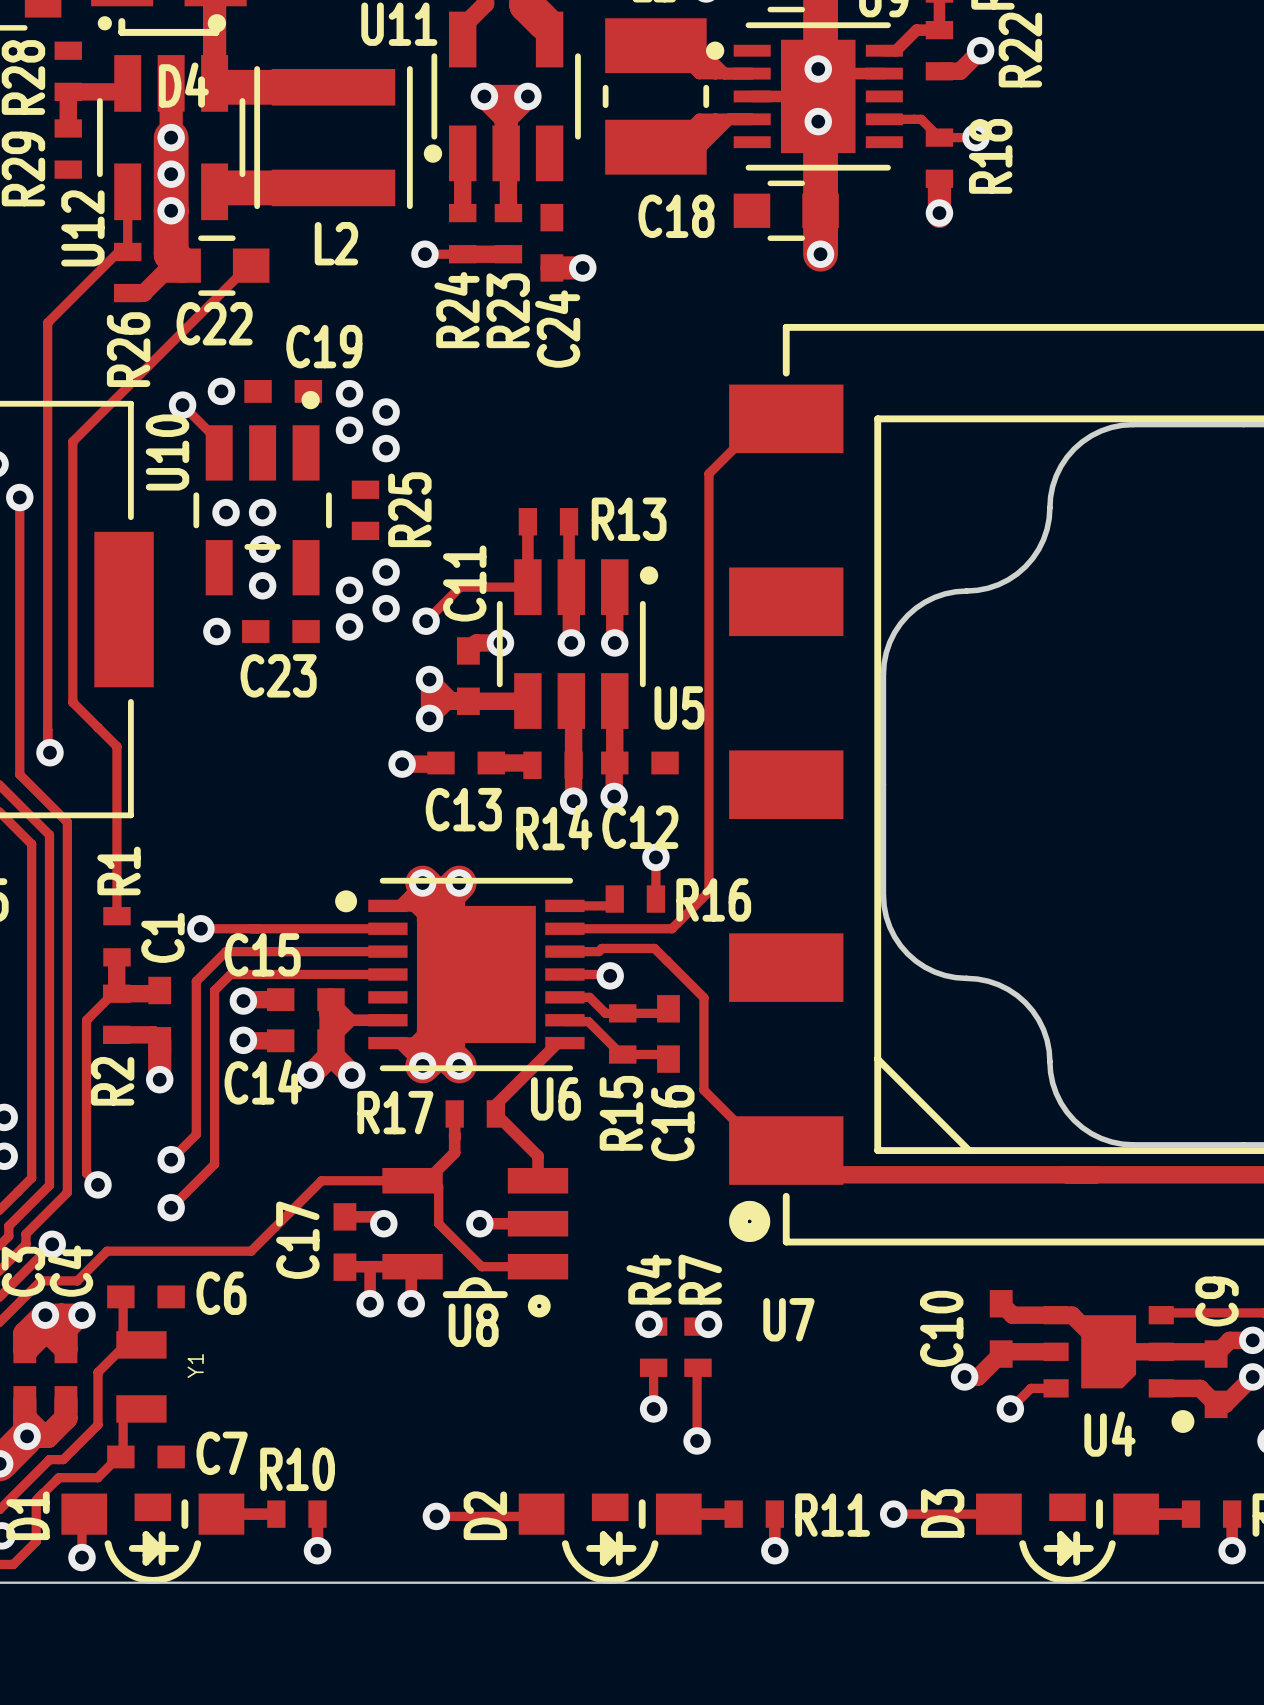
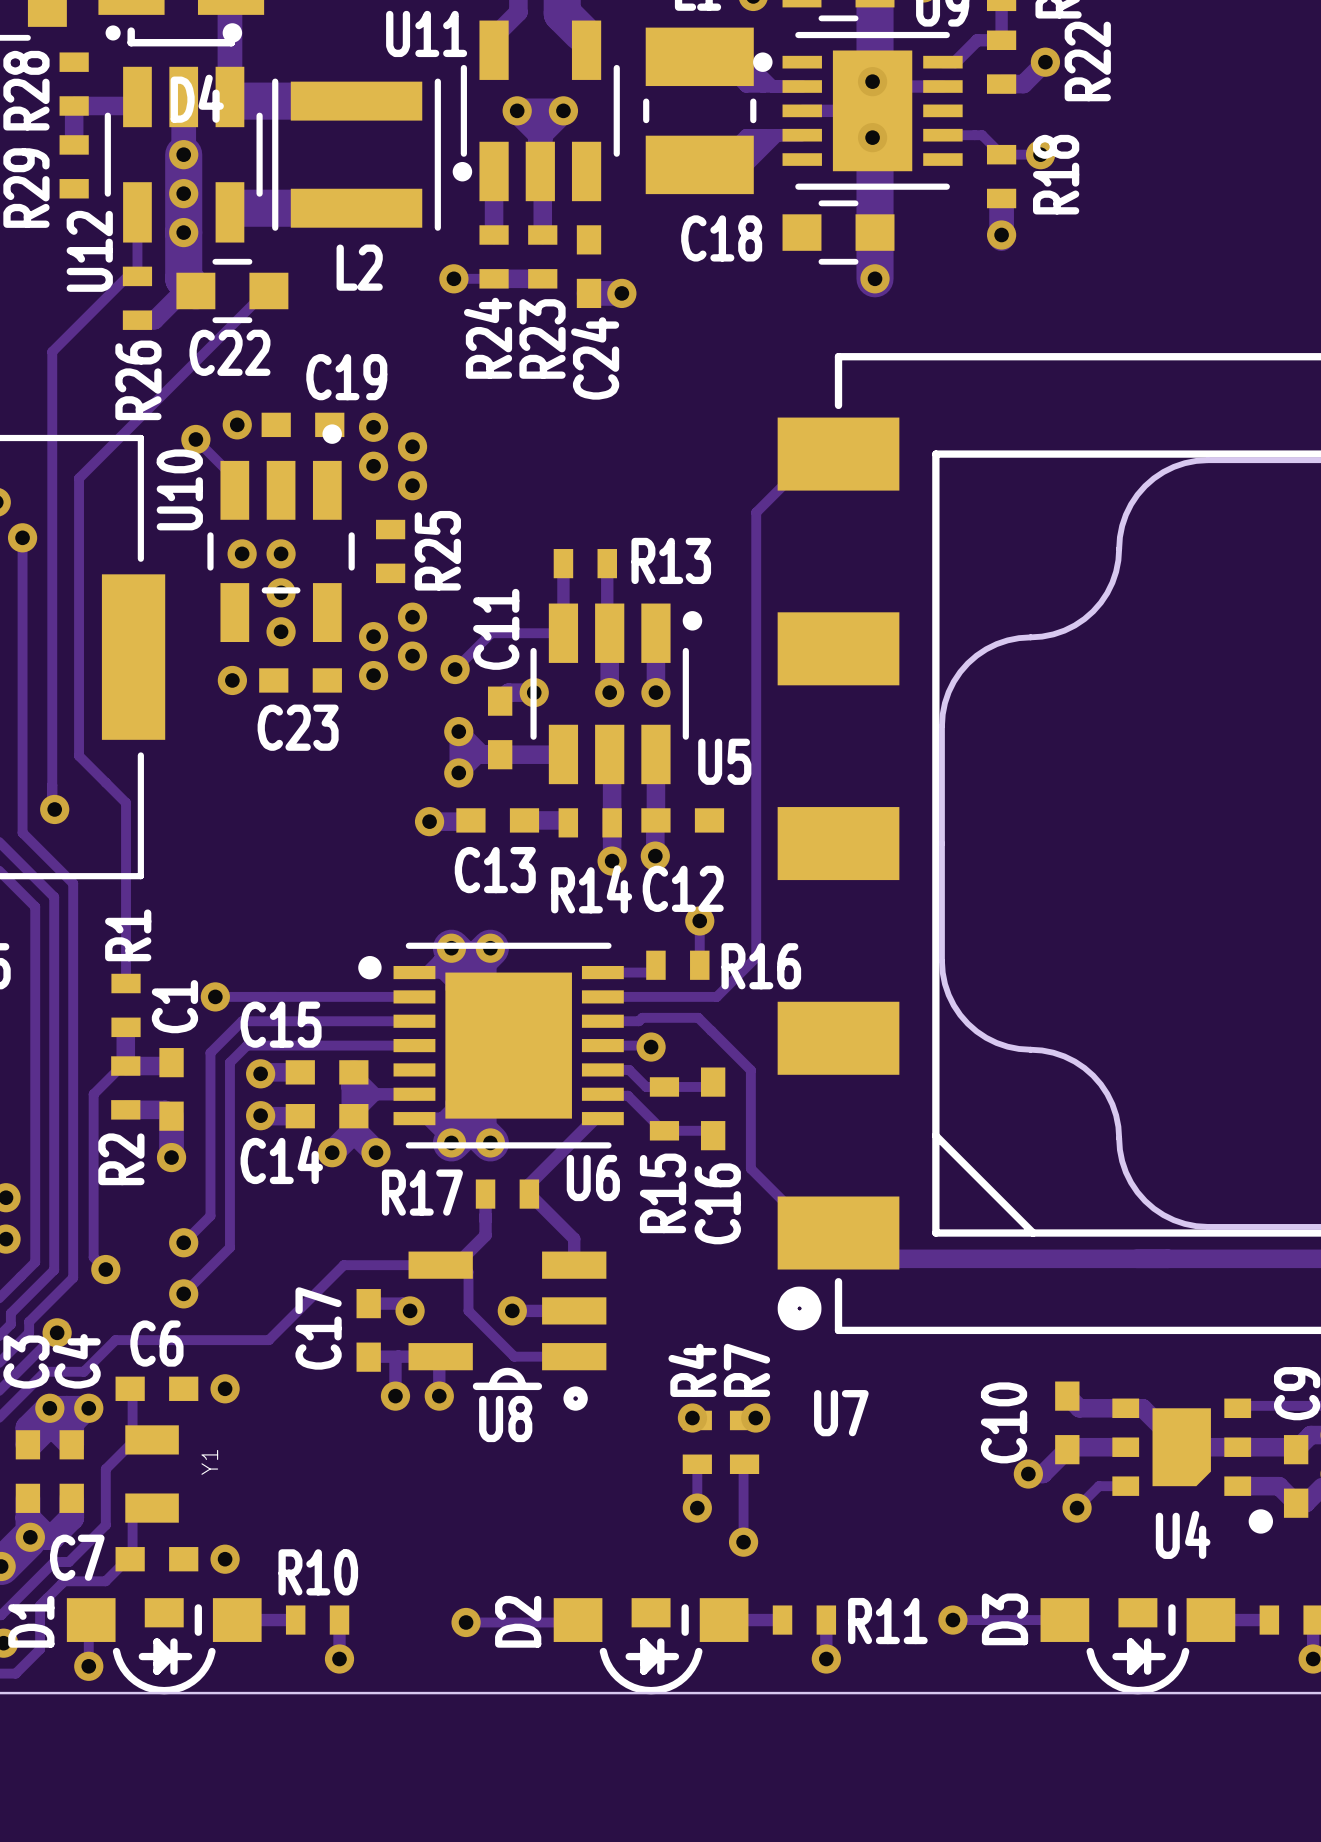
C6 name position: C6 (221, 1293) -> C6 (156, 1343)
via: none -> (225, 1388)
C7 name position: C7 (222, 1453) -> C7 (77, 1557)
via: none -> (225, 1559)

